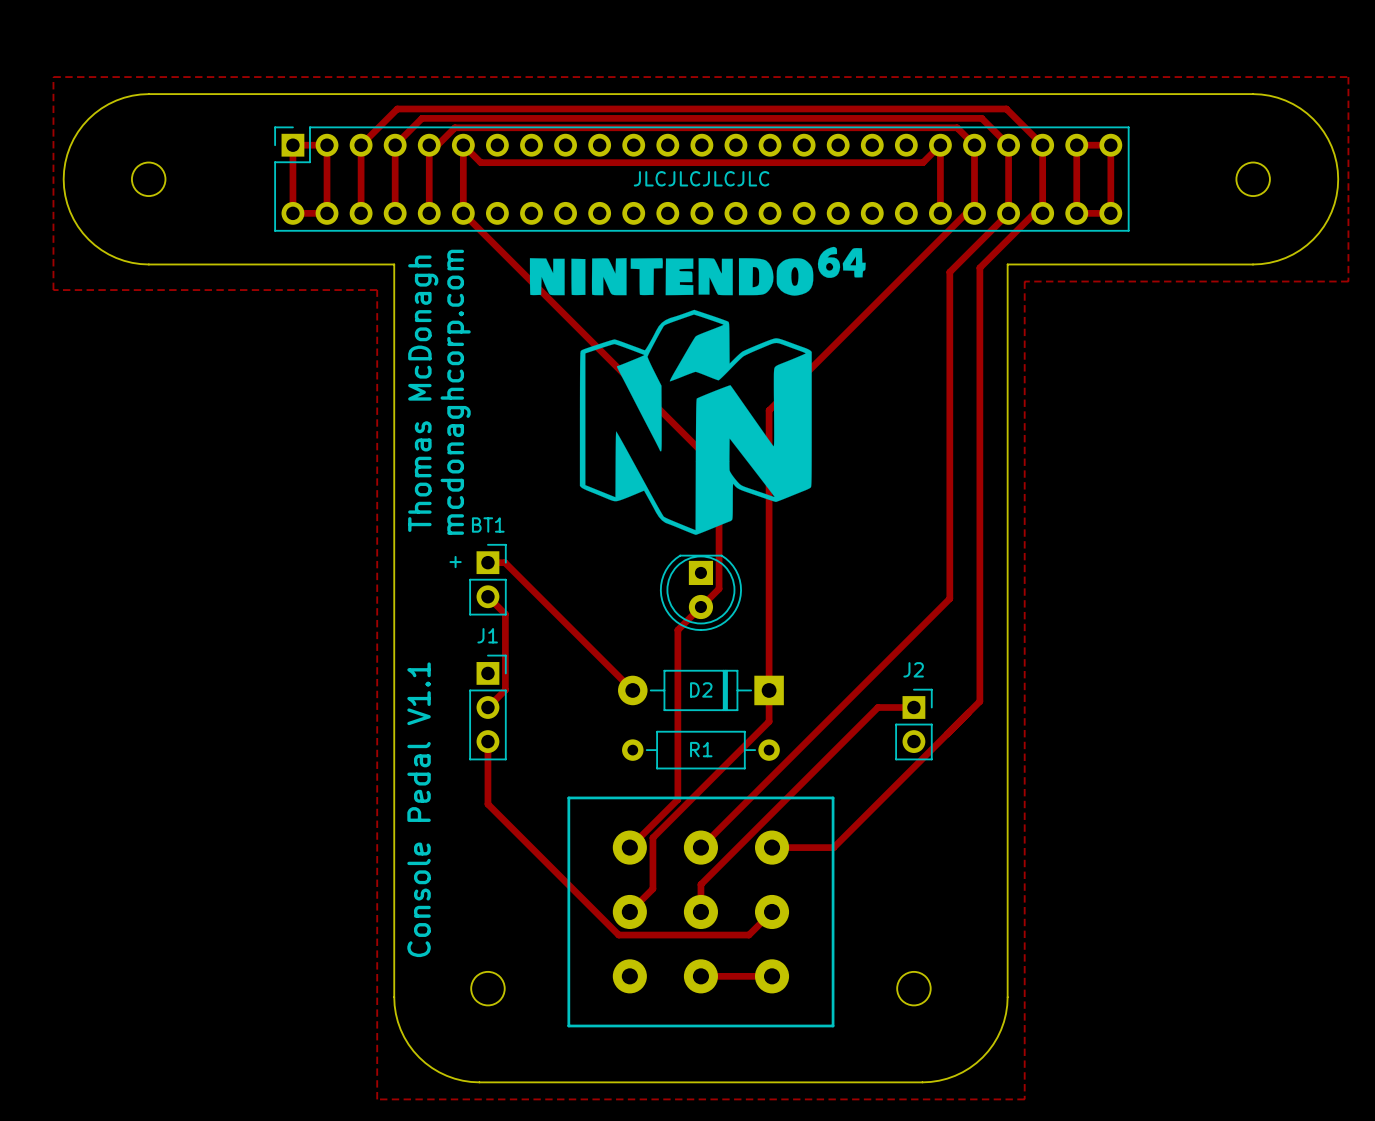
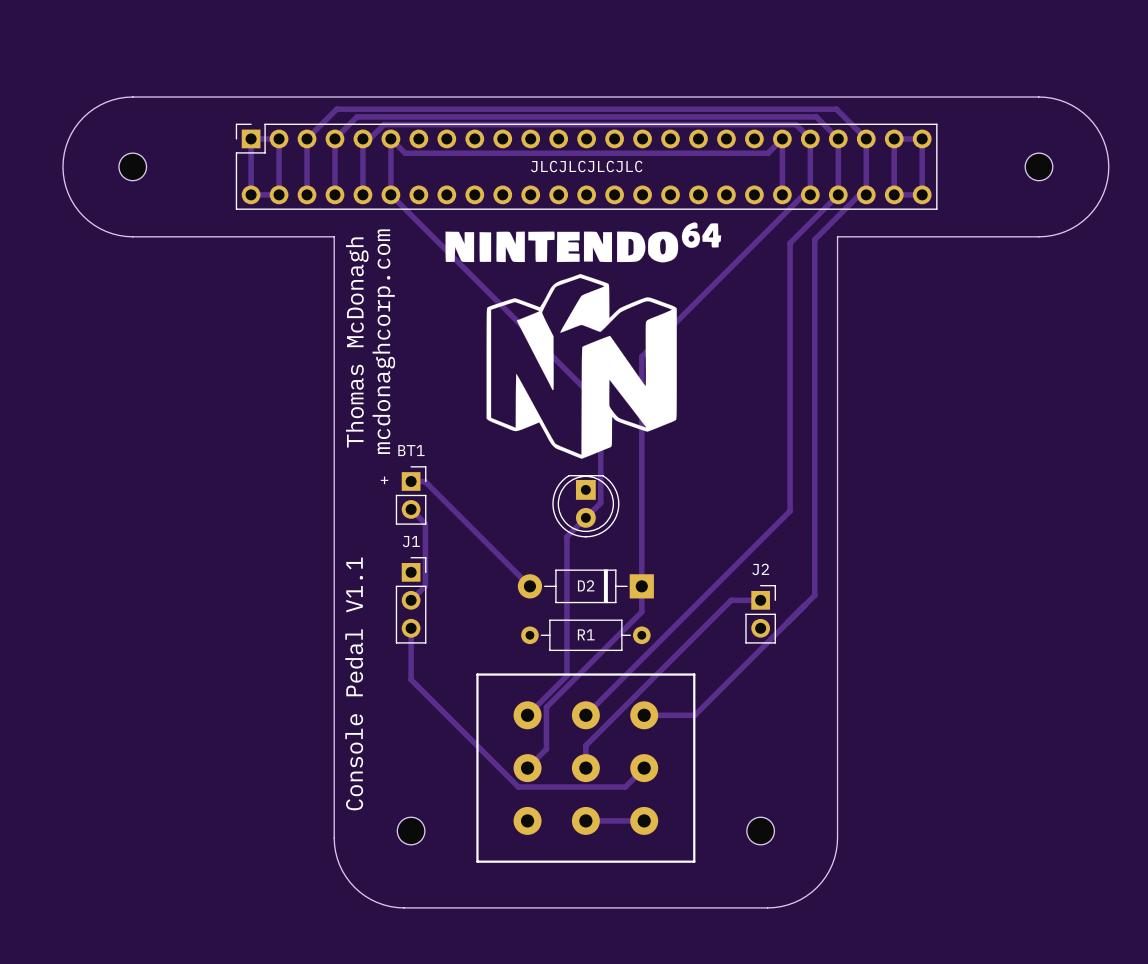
zone outline: (53, 77) (53, 290) (377, 290) (377, 1099) (1024, 1099) (1024, 281) (1348, 281) (1348, 77) (53, 77) -> none

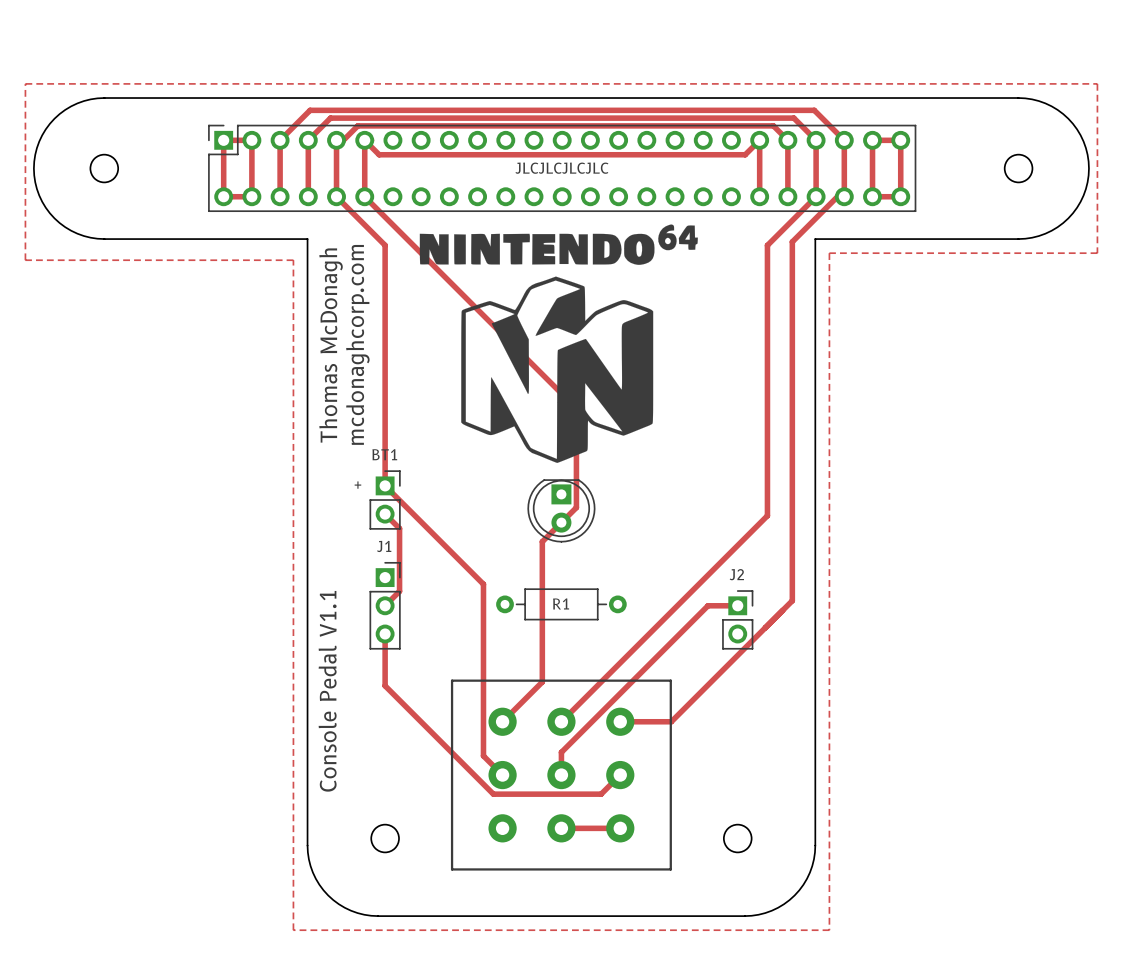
zone outline: none -> (25, 83) (25, 260) (293, 260) (293, 930) (829, 930) (829, 253) (1097, 253) (1097, 83) (25, 83)
track: (810, 194) (803, 194) (641, 356) (641, 611) (546, 707) (546, 749) (527, 768) -> (336, 196) (385, 245) (385, 485) (483, 584) (483, 755) (502, 775)
track: (411, 481) (425, 481) (529, 586) -> none
D2: (585, 586) -> none
R1 position: (585, 635) -> (561, 604)

